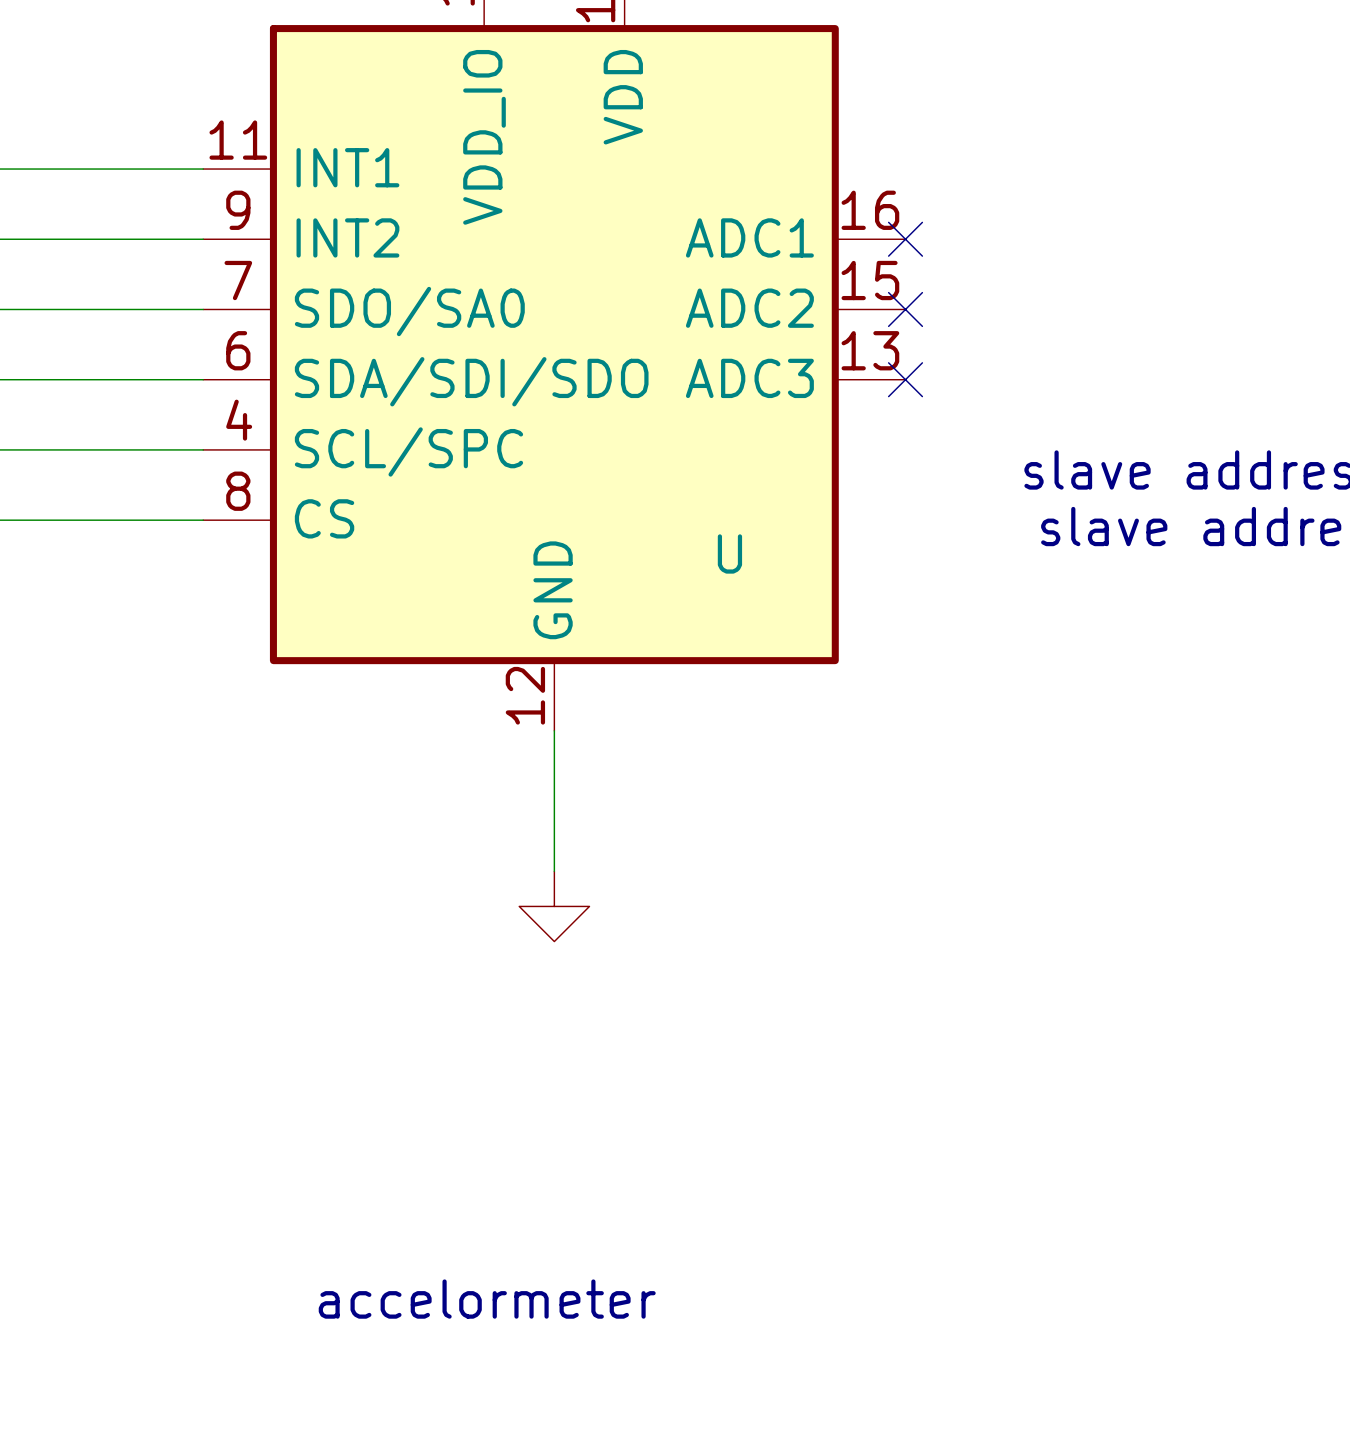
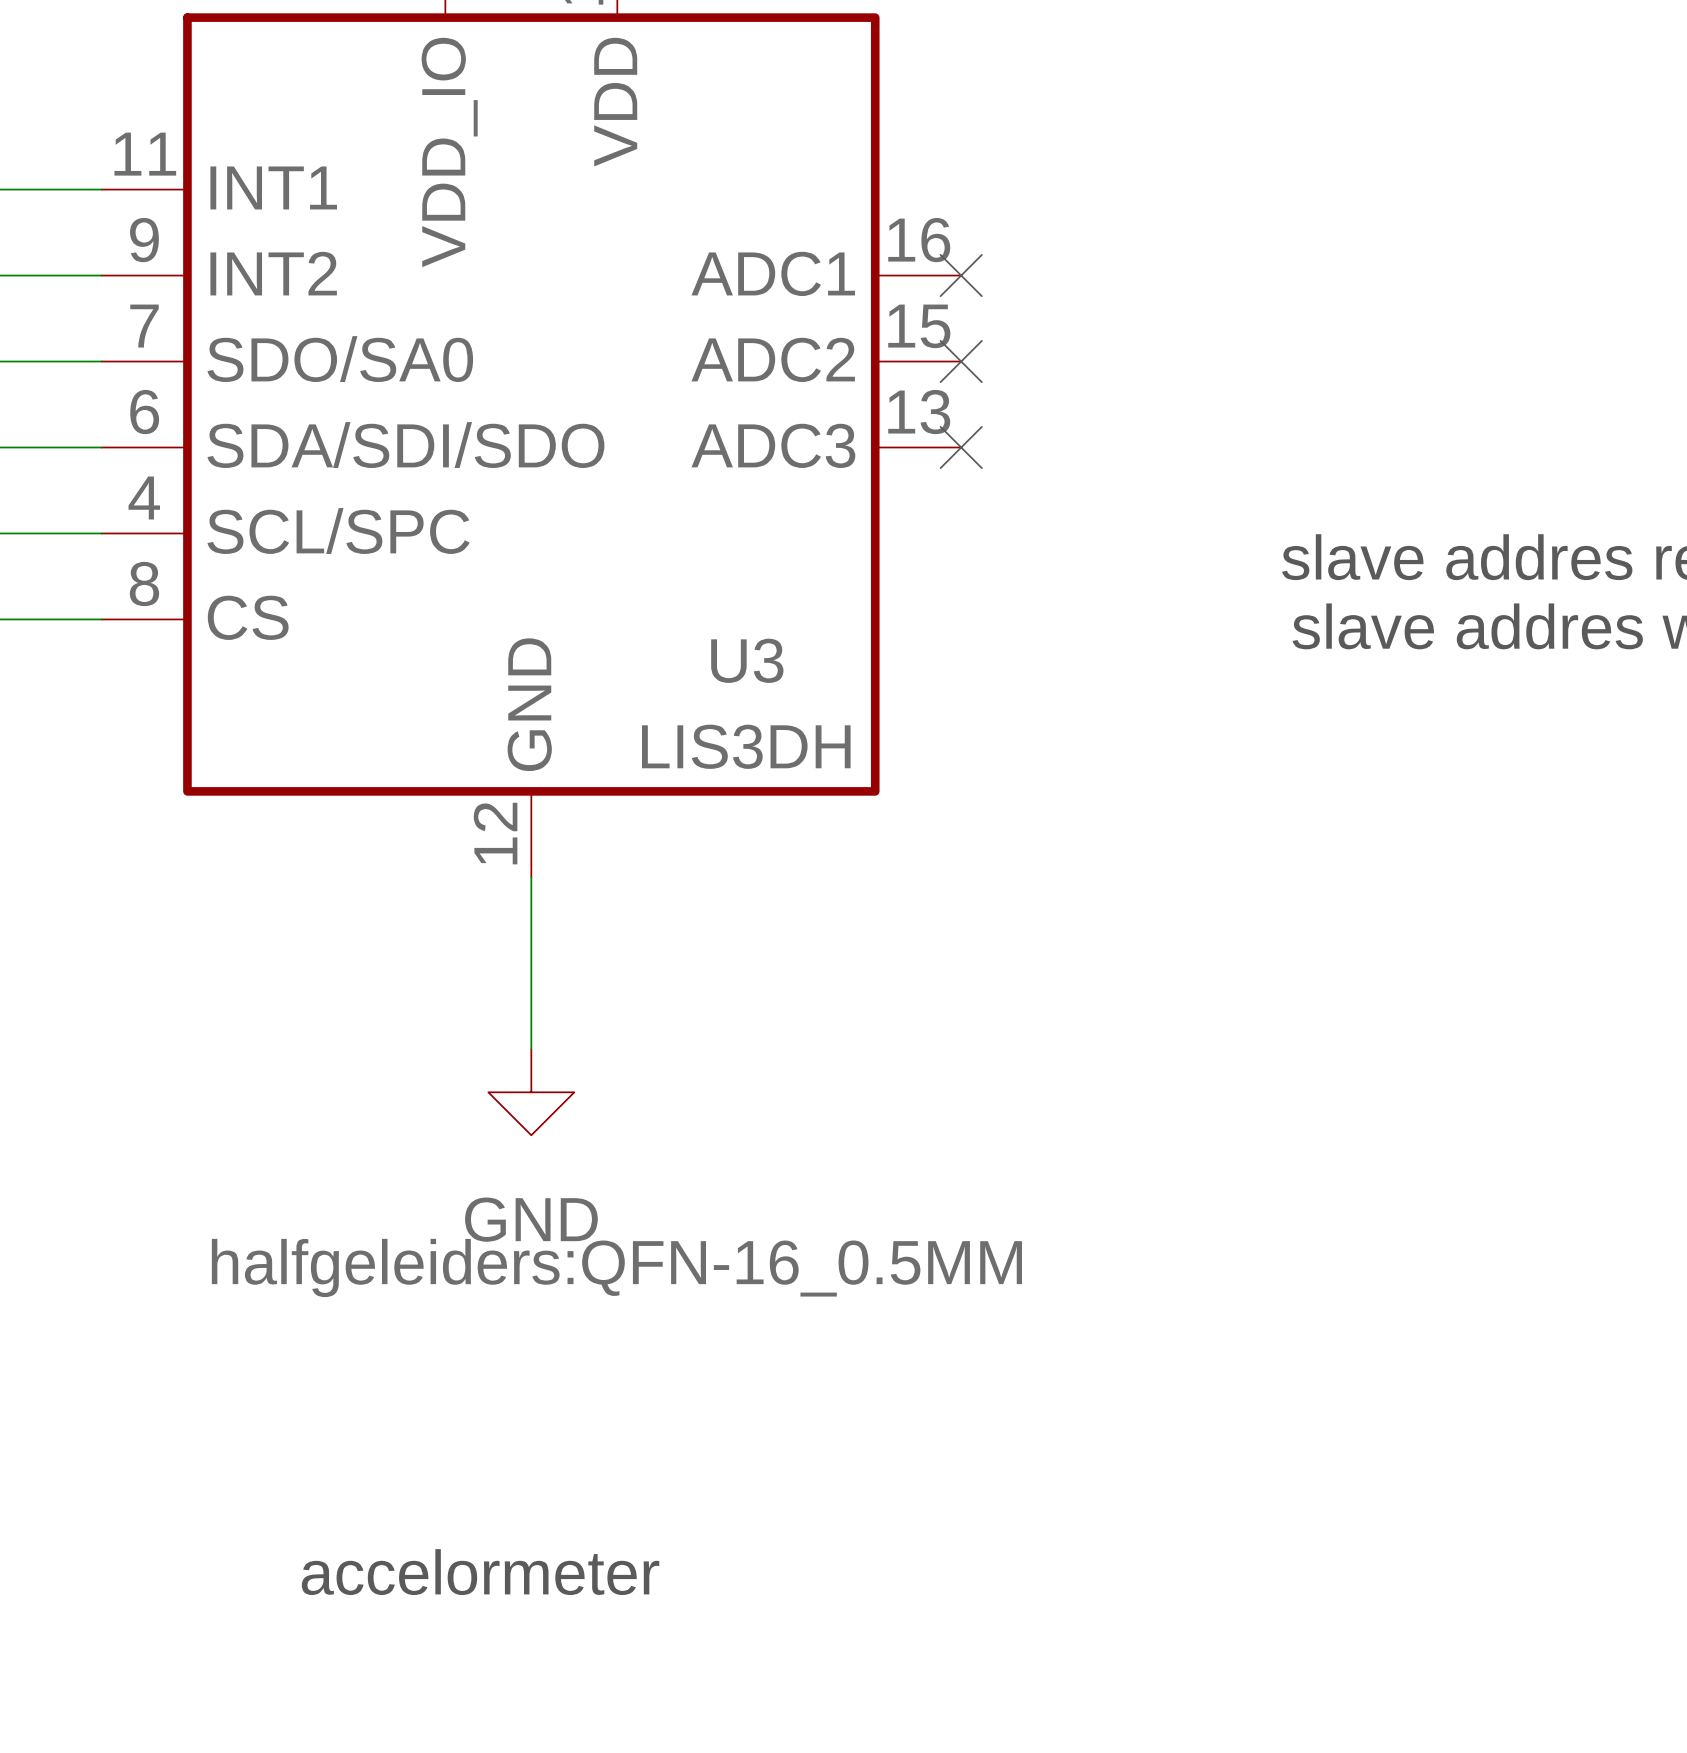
U name: U (729, 553) -> U3 (747, 660)
U value: none -> LIS3DH (746, 746)
power symbol text: none -> GND (531, 1219)
U text: none -> halfgeleiders:QFN-16_0.5MM (616, 1267)

